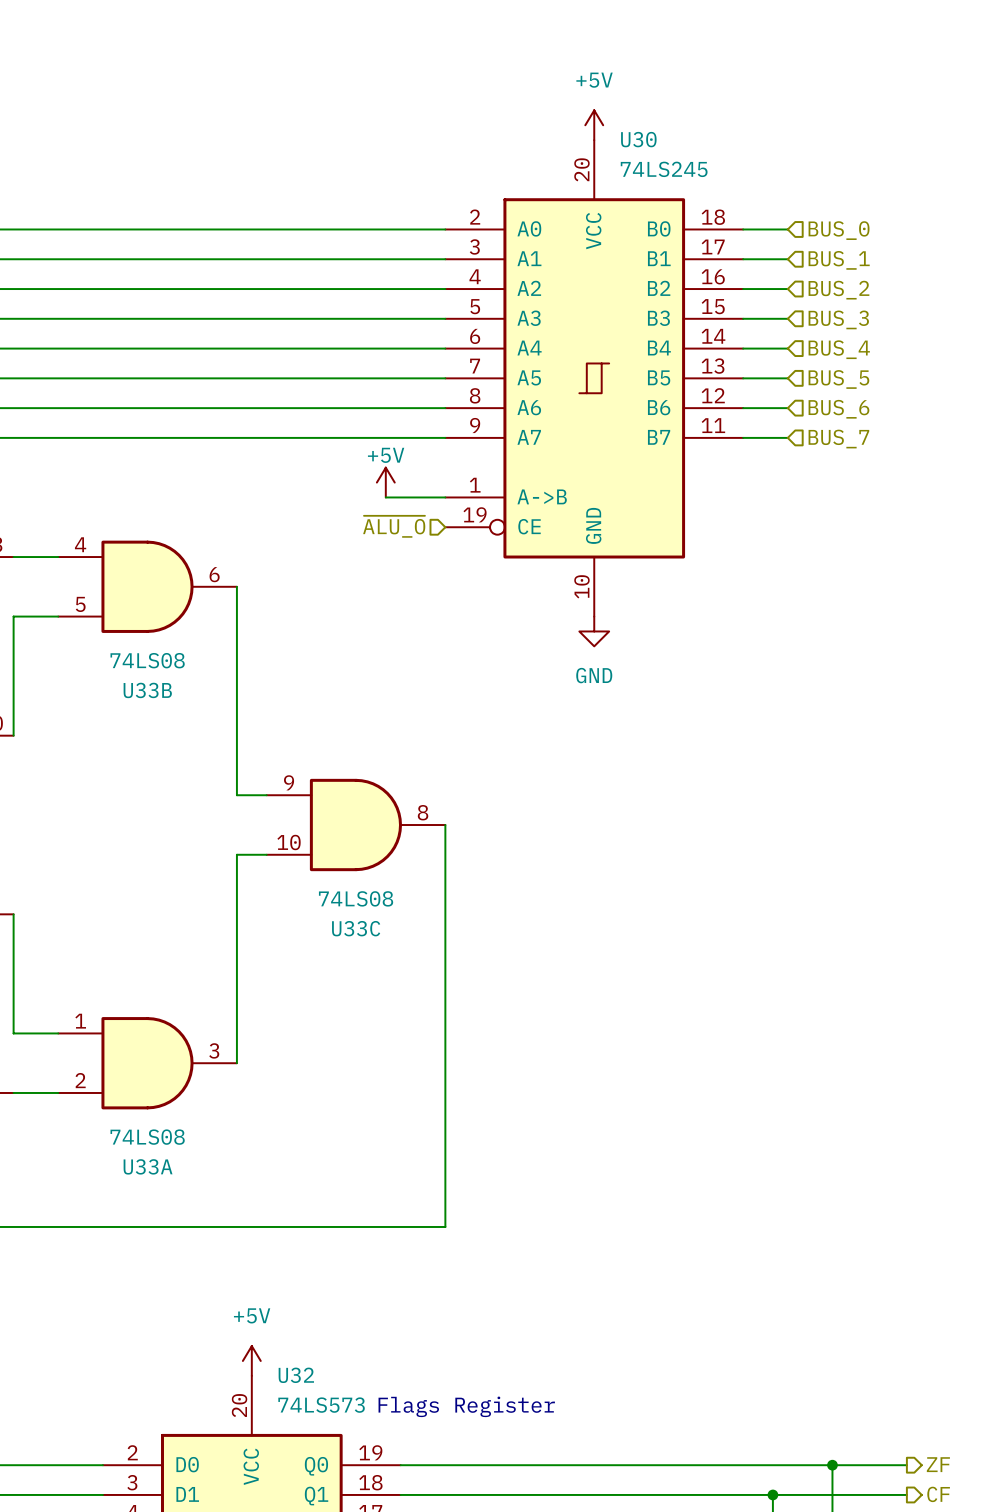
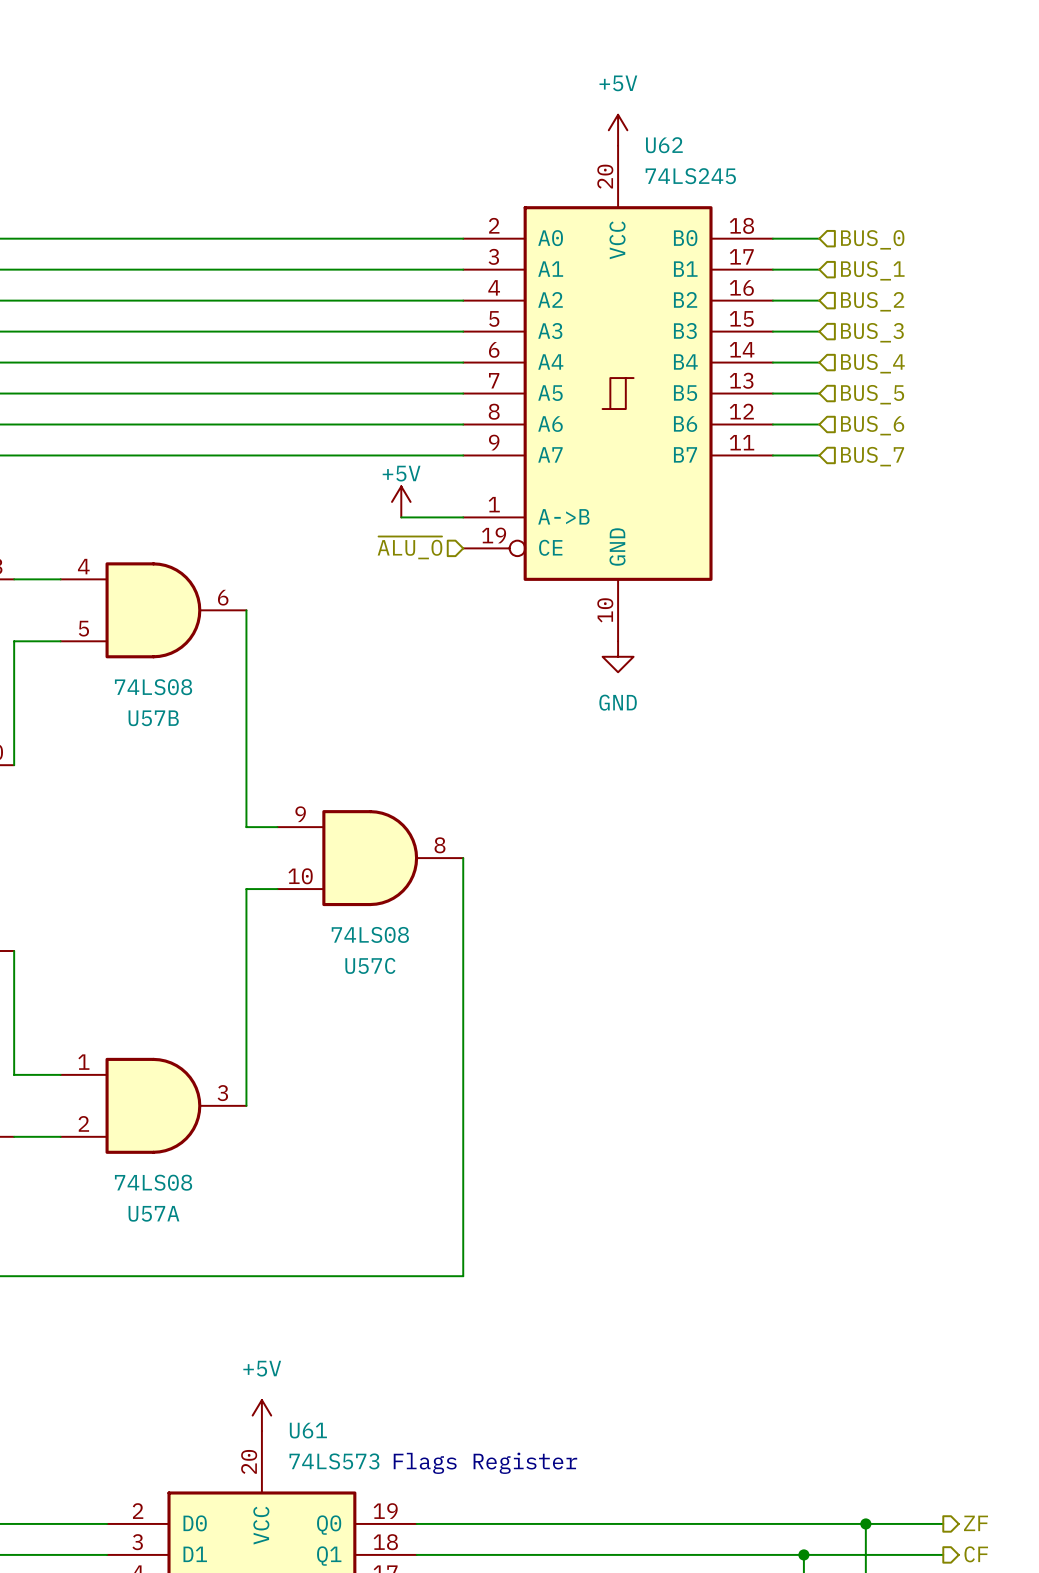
U30 name: U30 (638, 139) -> U62 (664, 145)
U33B name: U33B (147, 690) -> U57B (153, 718)
U33C name: U33C (356, 928) -> U57C (370, 965)
U33A name: U33A (148, 1166) -> U57A (153, 1213)
U32 name: U32 (296, 1375) -> U61 (308, 1430)

